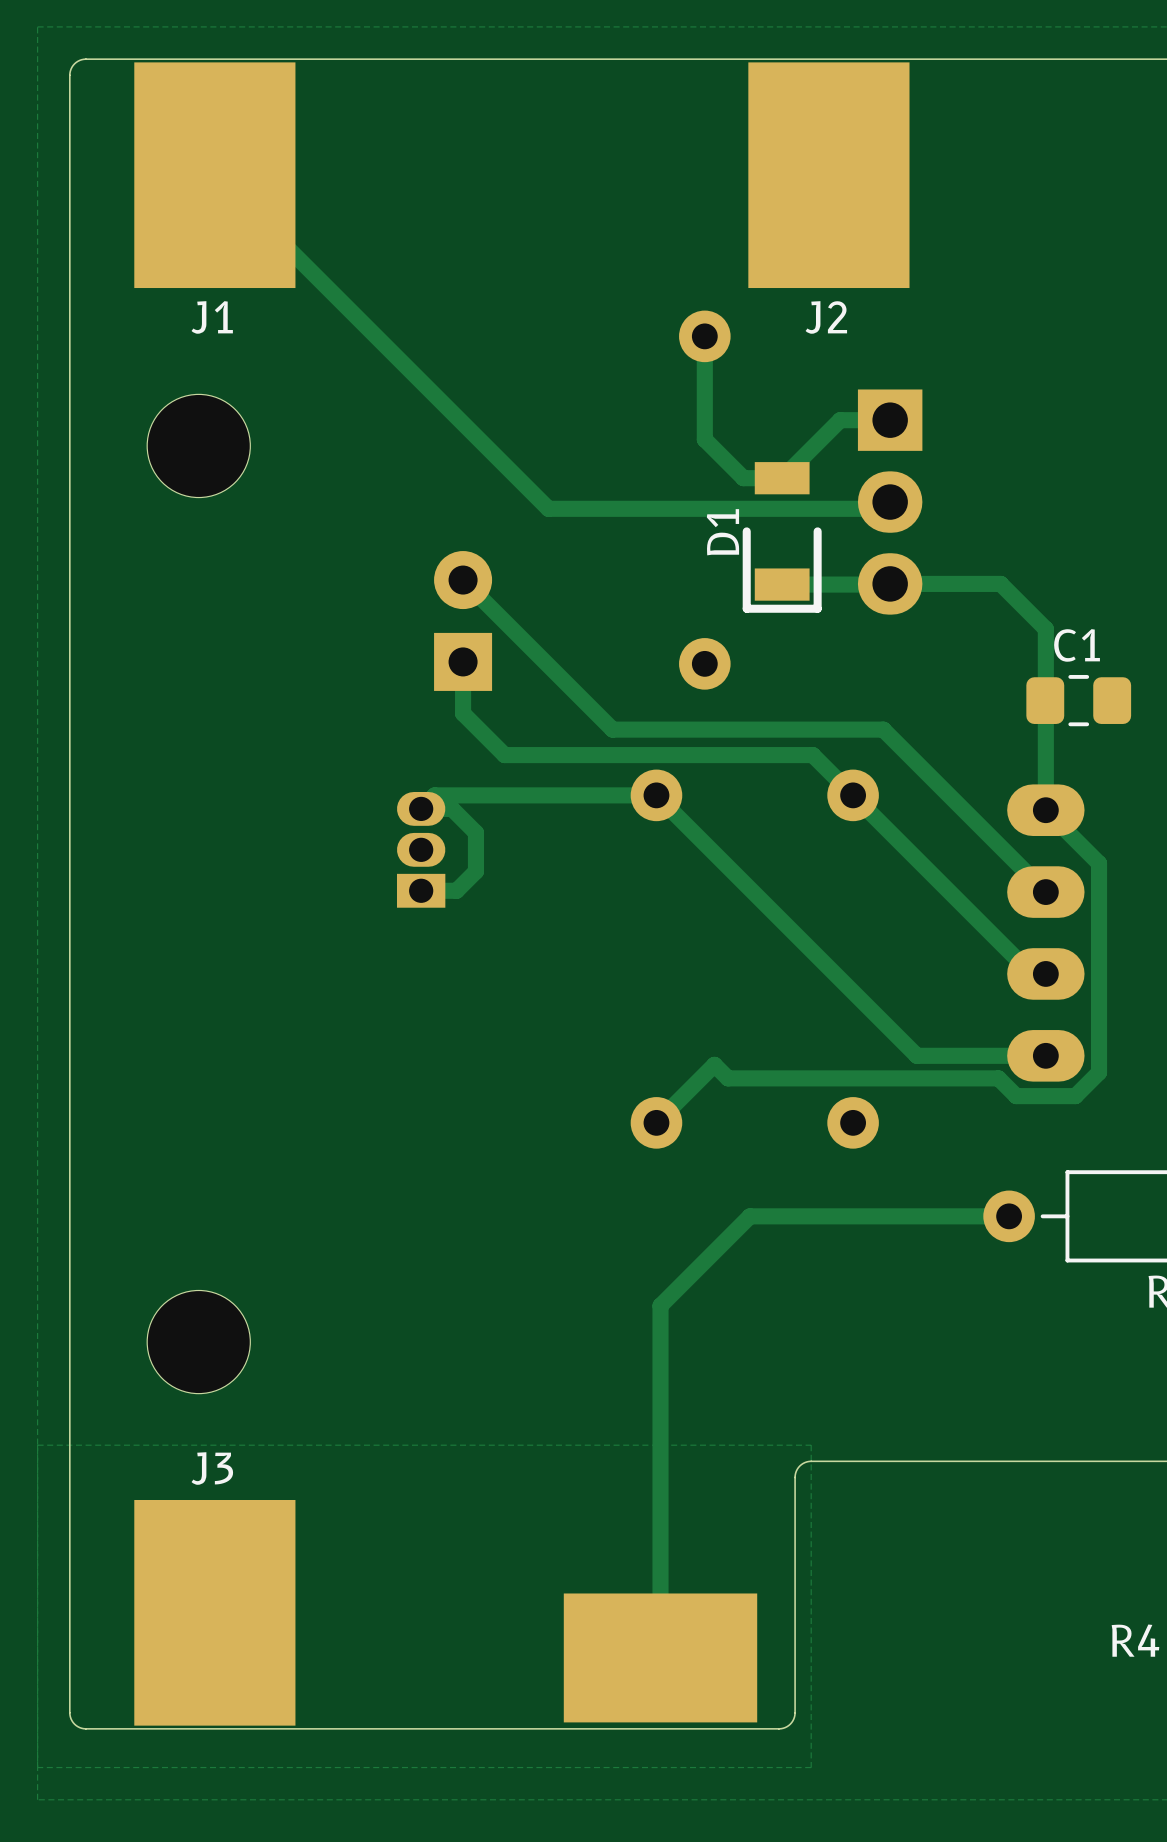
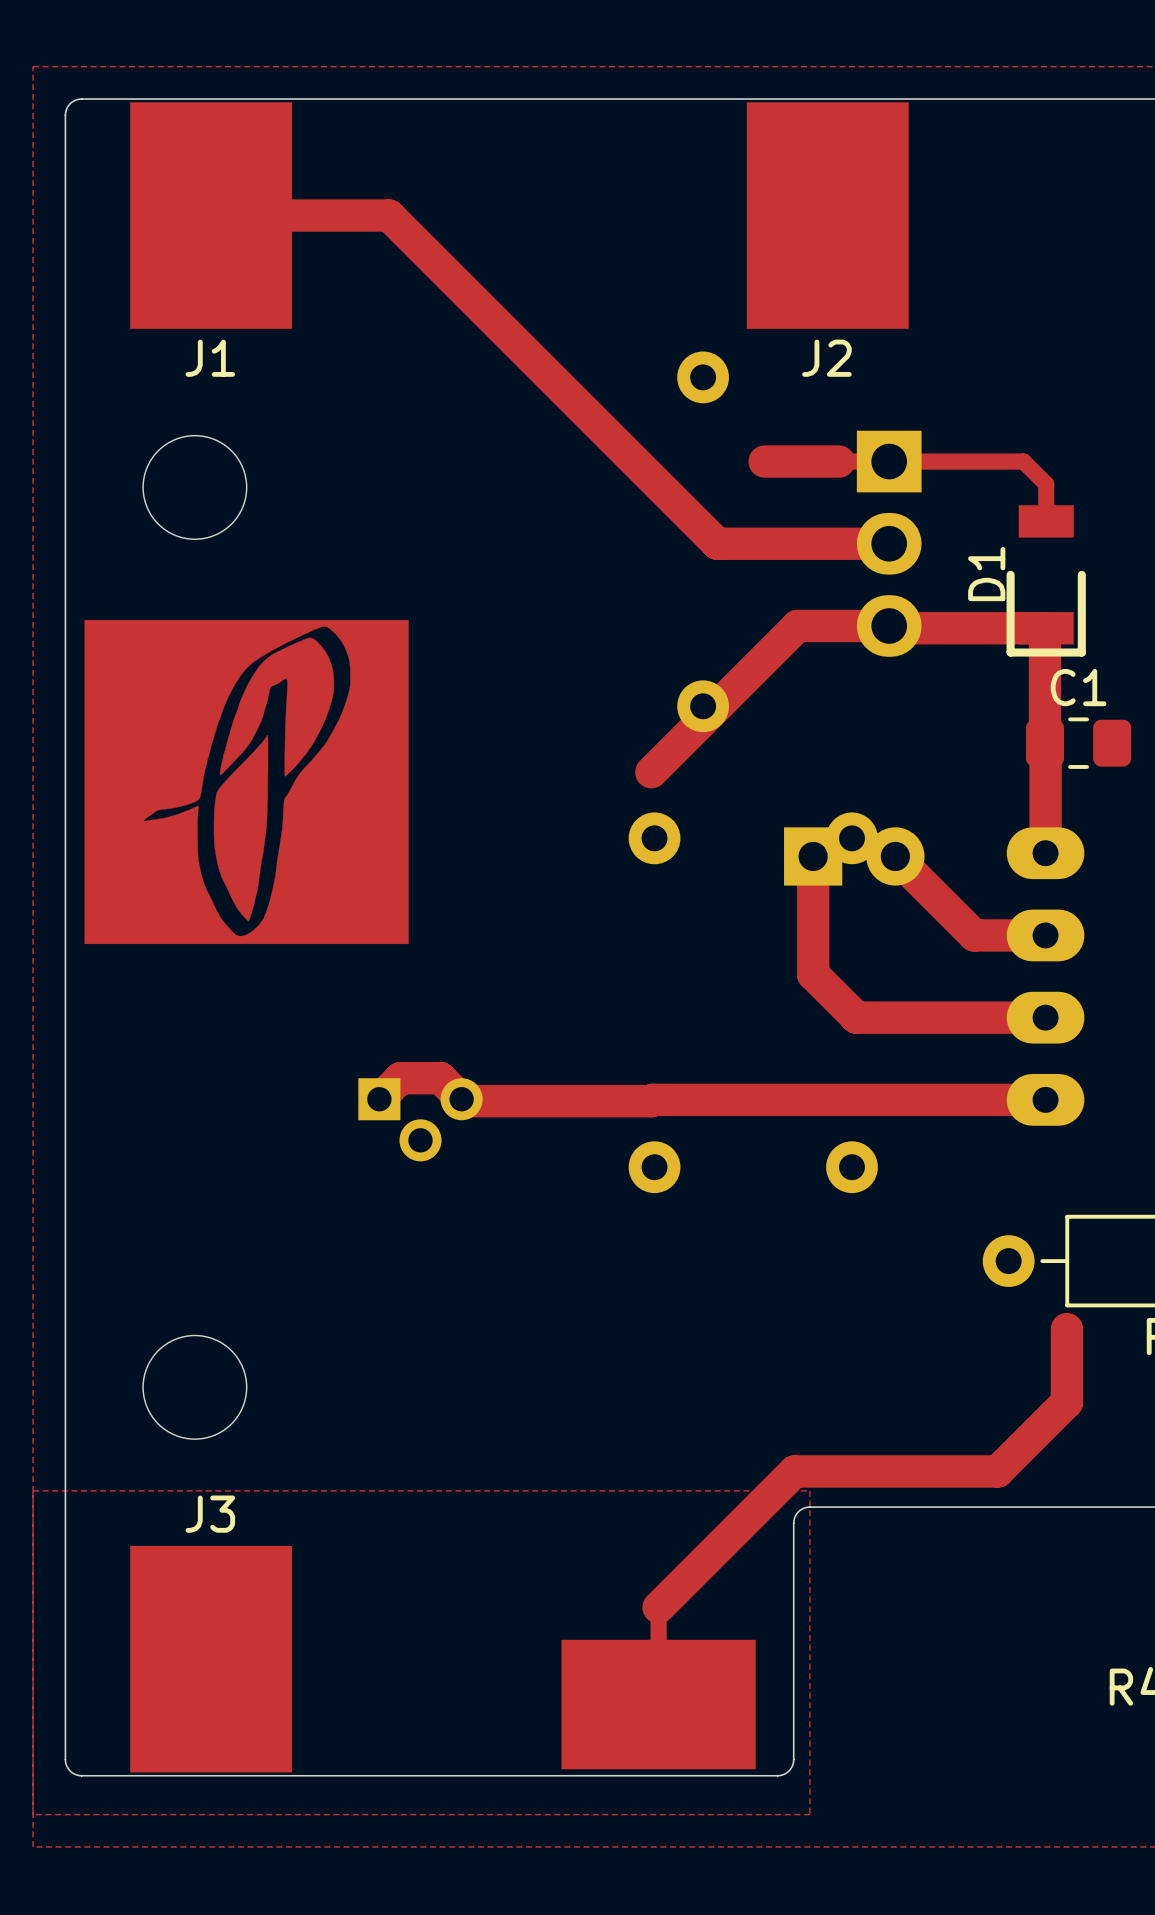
track: (214, 175) (548, 508) (883, 508) (890, 502) -> (211, 215) (389, 215) (717, 543) (889, 543)
track: (704, 336) (704, 439) (743, 478) (782, 478) (840, 420) -> (764, 461) (839, 461)
track: none -> (889, 461) (1023, 461) (1046, 484) (1046, 521)
D1 position: (782, 537) -> (1046, 580)
drawing: none -> [84, 619, 409, 945]
track: (463, 580) (612, 729) (883, 729) (1045, 892) -> (895, 856) (974, 935) (1045, 935)
track: (782, 584) (1000, 583) (1045, 629) (1045, 701) -> (651, 772) (797, 625) (1046, 628) (1045, 743)
part rotation: 0° (463, 620) -> 90° clockwise (854, 856)
part position: (463, 620) -> (854, 856)
track: (463, 661) (463, 713) (504, 755) (812, 755) (1031, 973) -> (813, 856) (813, 974) (856, 1017) (1031, 1017)
track width: thin (1045, 701) (1045, 810) -> thick (1045, 743) (1045, 853)
track: (1045, 810) (1099, 863) (1099, 1072) (1075, 1096) (1016, 1096) (998, 1078) (728, 1078) (714, 1064) (656, 1122) -> none
part: (421, 849) -> none
track: (421, 890) (456, 890) (475, 871) (475, 832) (452, 808) (421, 808) (434, 795) (656, 795) (916, 1055) -> (379, 1099) (400, 1078) (440, 1078) (463, 1101) (916, 1099)
track width: thin (916, 1055) (1045, 1055) -> thick (916, 1099) (1045, 1099)
part: none -> (420, 1119)
track: (1009, 1216) (749, 1216) (660, 1305) (660, 1561) -> (1066, 1329) (1066, 1402) (997, 1471) (794, 1471) (658, 1607)

